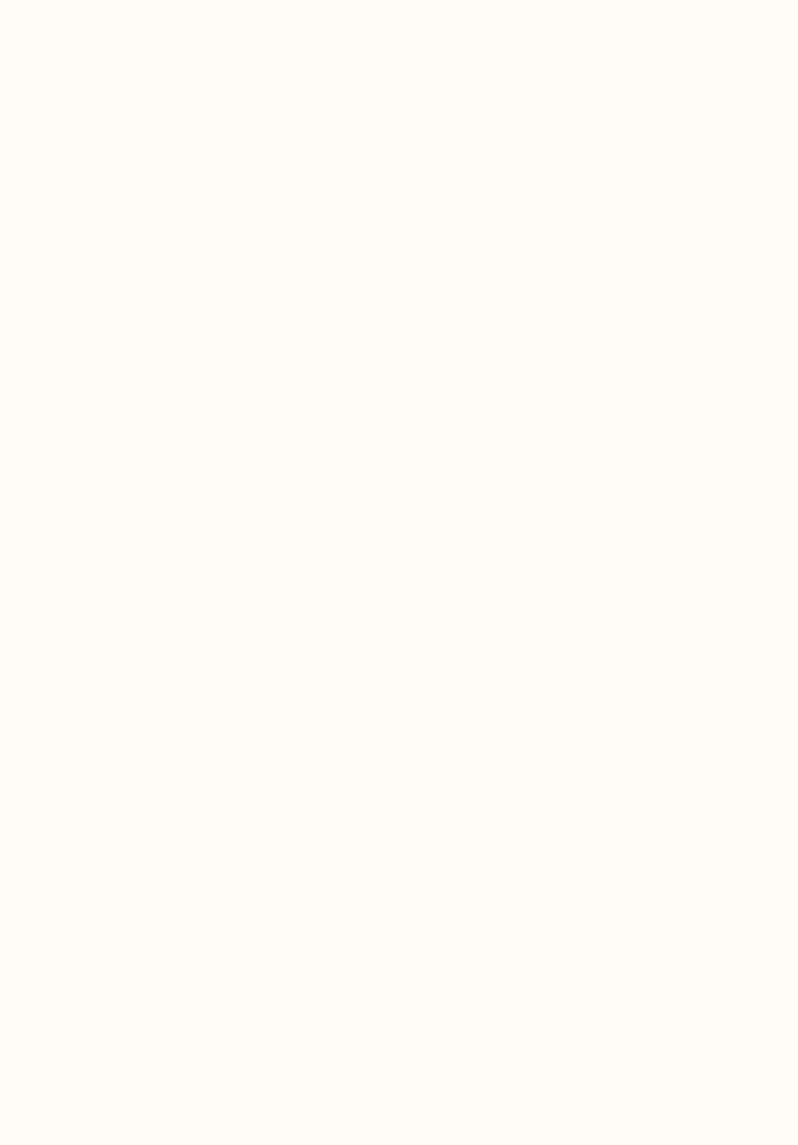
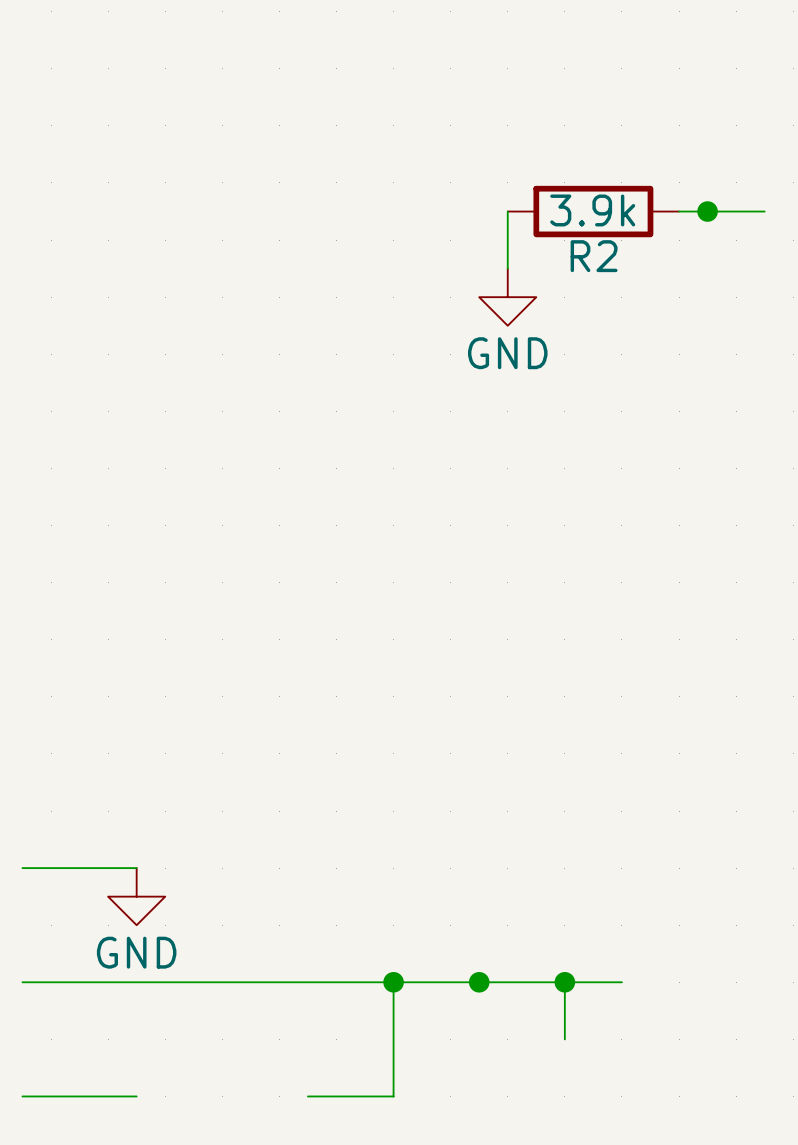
wire: none -> (507, 211) (507, 268)
R2: none -> 3.9k (593, 211)
wire: none -> (679, 211) (764, 211)
junction: none -> (707, 211)
power symbol: none -> GND (507, 297)
wire: none -> (22, 868) (136, 868)
power symbol: none -> GND (136, 896)
wire: none -> (22, 982) (621, 982)
wire: none -> (393, 982) (393, 1096) (307, 1096)
junction: none -> (393, 982)
junction: none -> (479, 982)
wire: none -> (564, 982) (564, 1039)
junction: none -> (564, 982)
wire: none -> (22, 1096) (136, 1096)

